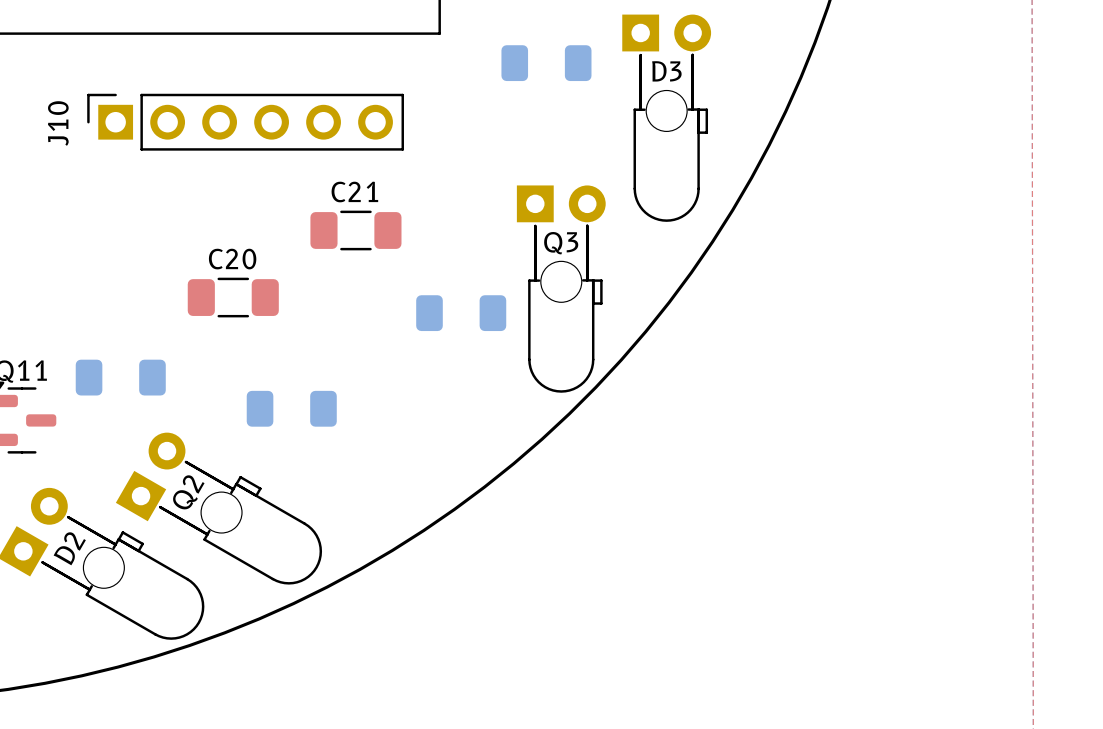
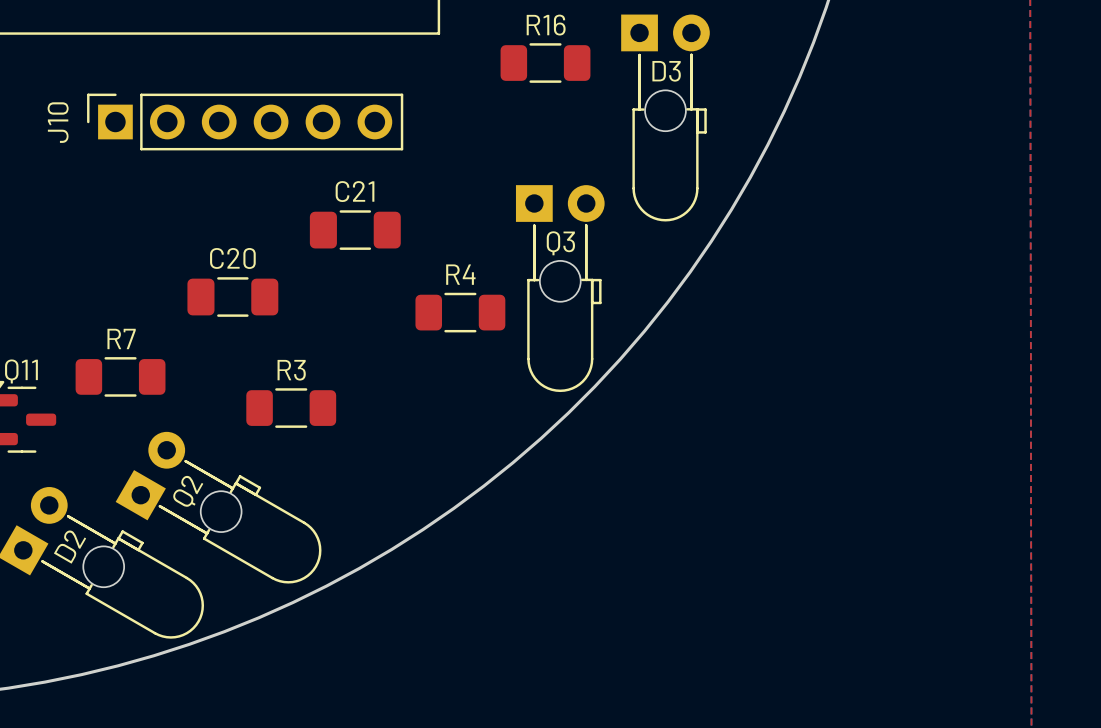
R16 side: bottom (546, 63) -> top (545, 63)
R4 side: bottom (461, 313) -> top (460, 312)
R7 side: bottom (120, 377) -> top (120, 376)
R3 side: bottom (291, 408) -> top (291, 408)

